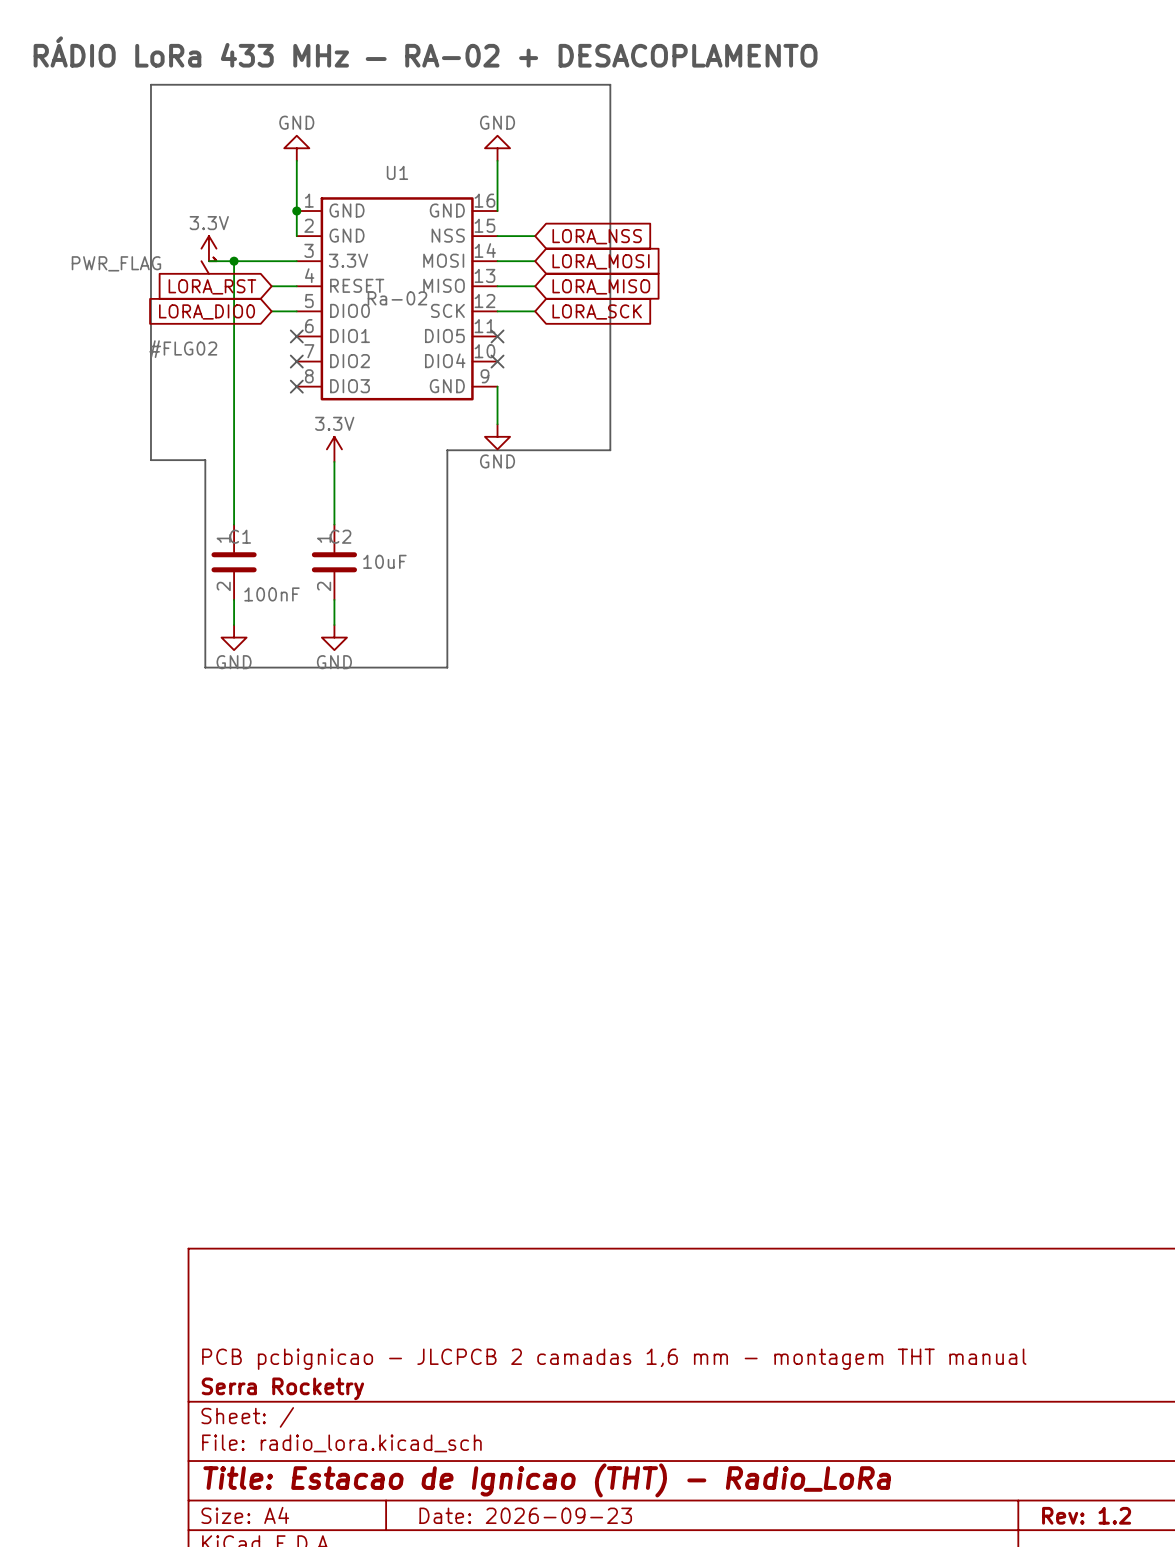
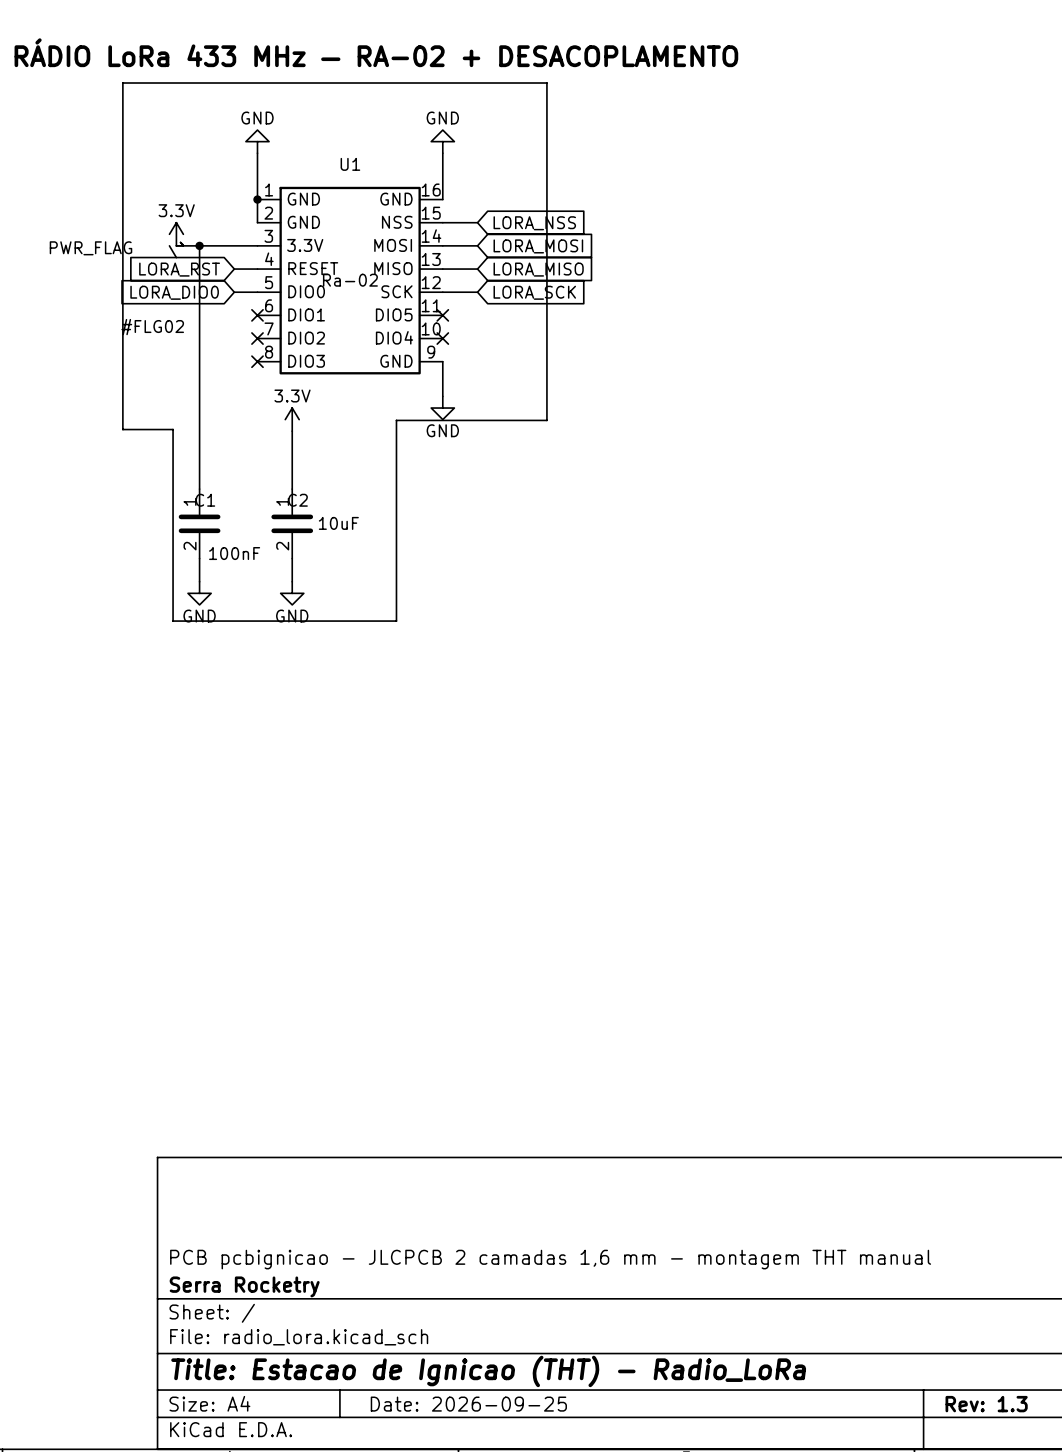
title block: Date: 2026-09-23 (525, 1515) -> Date: 2026-09-25 (468, 1404)
title block: Rev: 1.2 (1086, 1515) -> Rev: 1.3 (986, 1404)

